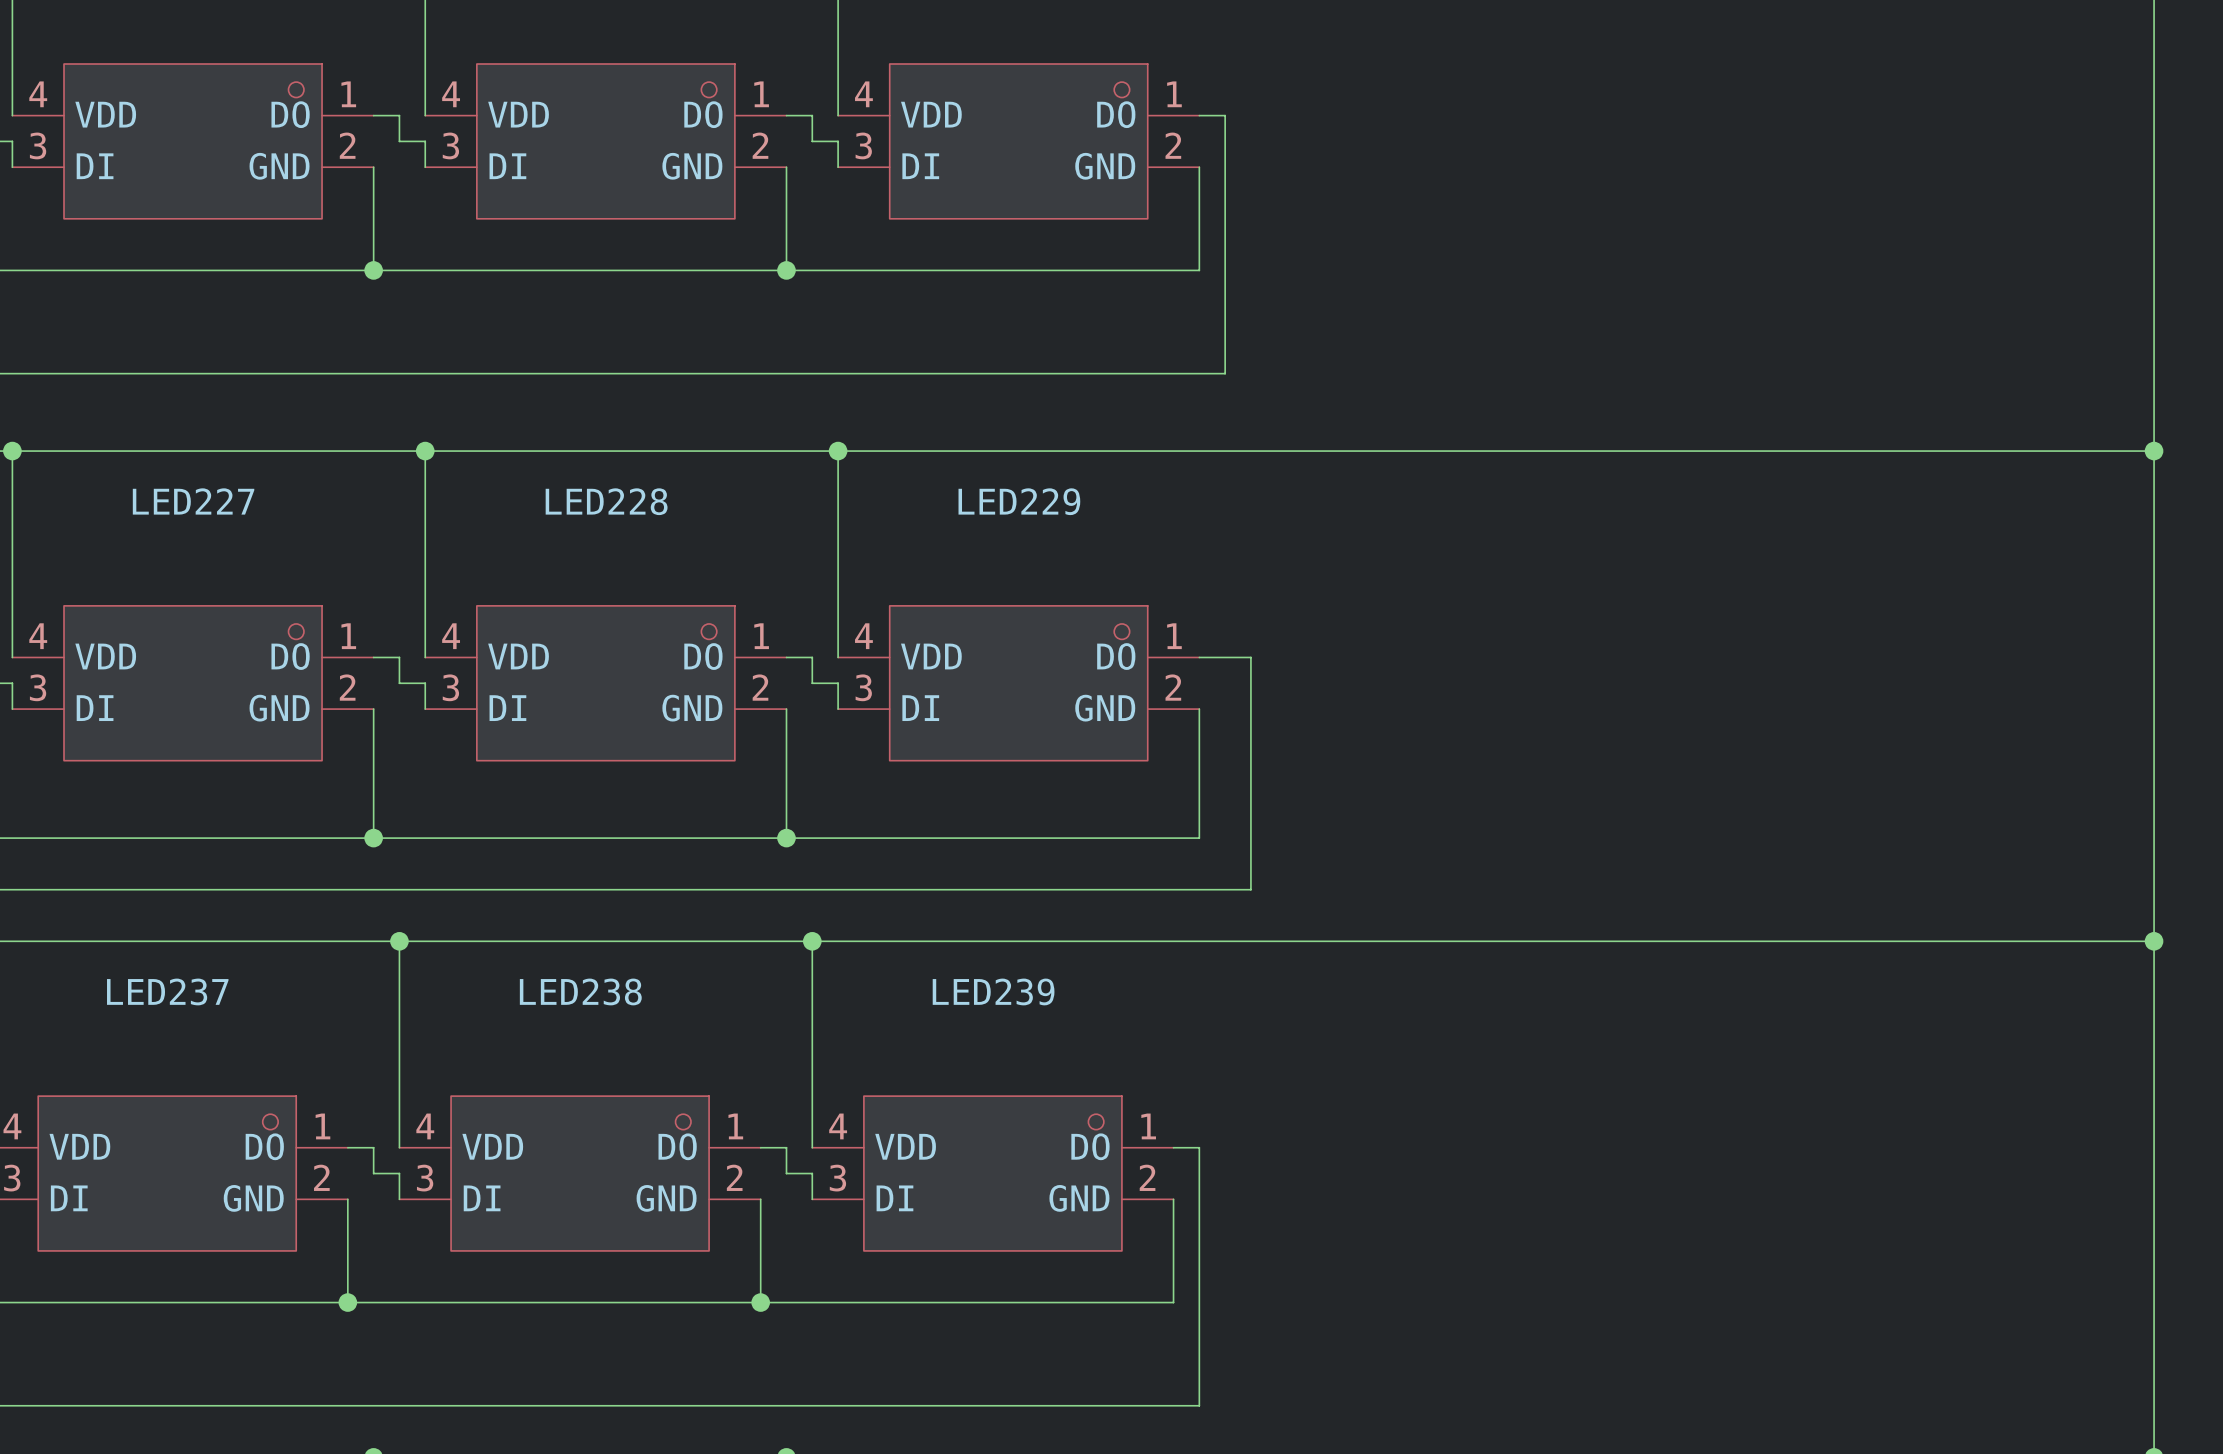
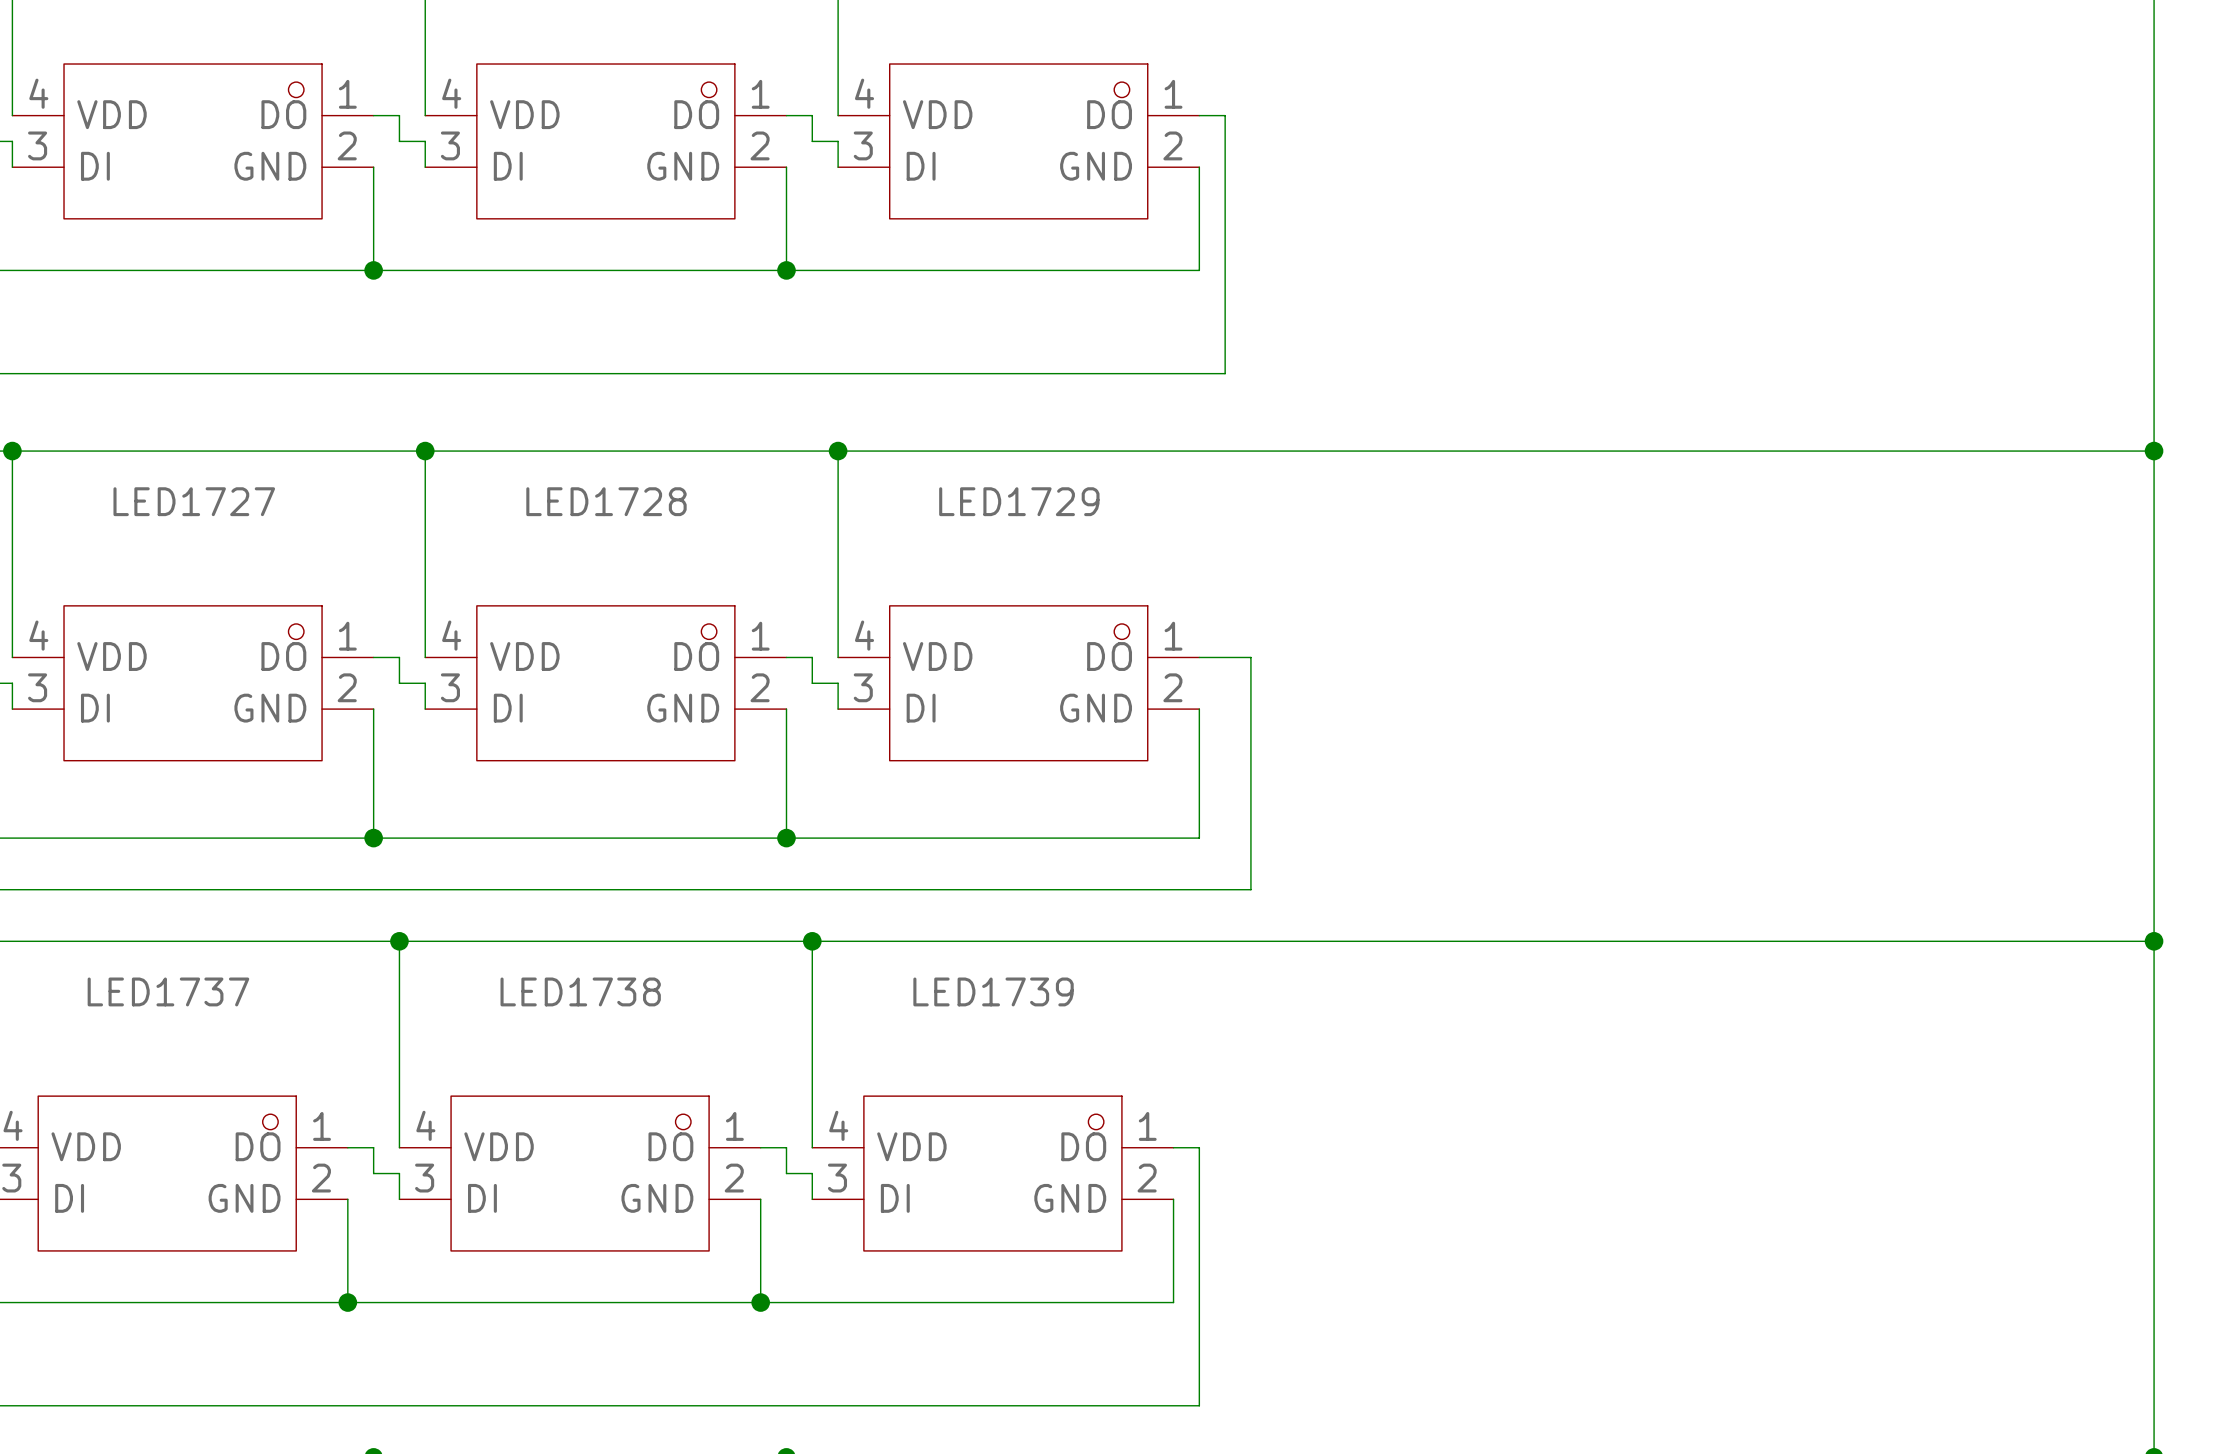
LED227 name: LED227 (193, 501) -> LED1727 (194, 501)
LED228 name: LED228 (606, 501) -> LED1728 (606, 501)
LED229 name: LED229 (1019, 501) -> LED1729 (1019, 501)
LED237 name: LED237 (167, 991) -> LED1737 (168, 991)
LED238 name: LED238 (580, 991) -> LED1738 (580, 991)
LED239 name: LED239 (993, 991) -> LED1739 (993, 991)

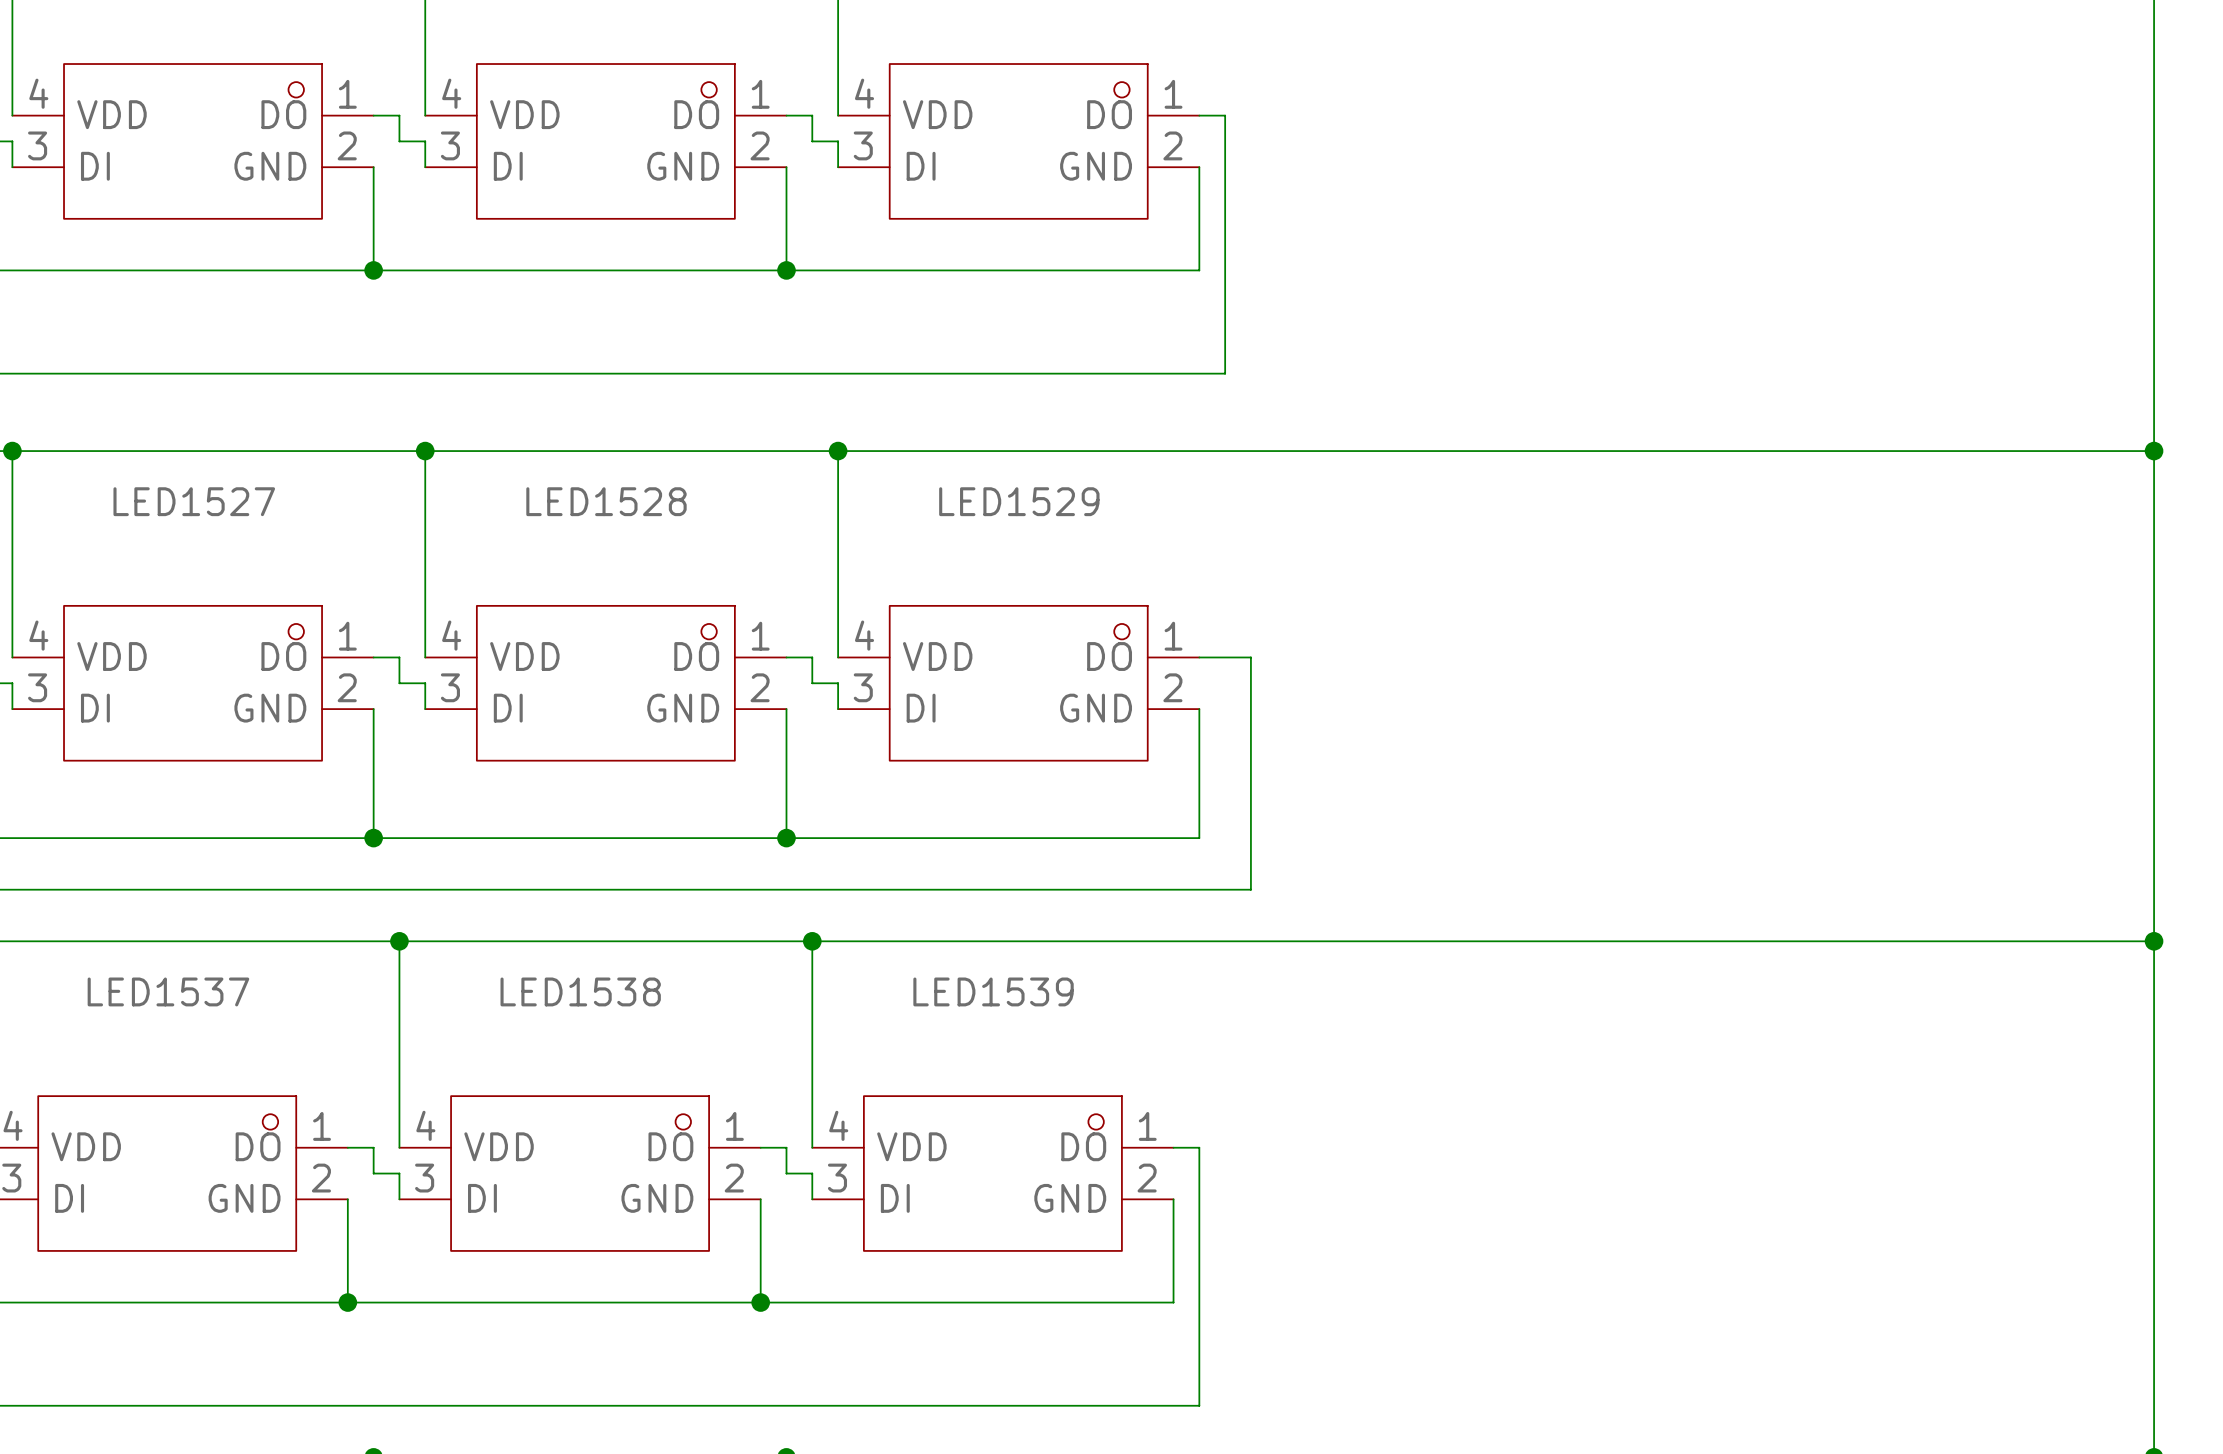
LED1727 name: LED1727 (194, 501) -> LED1527 (194, 501)
LED1728 name: LED1728 (606, 501) -> LED1528 (606, 501)
LED1729 name: LED1729 (1019, 501) -> LED1529 (1019, 501)
LED1737 name: LED1737 (168, 991) -> LED1537 (168, 991)
LED1738 name: LED1738 (580, 991) -> LED1538 (580, 991)
LED1739 name: LED1739 (993, 991) -> LED1539 (993, 991)

